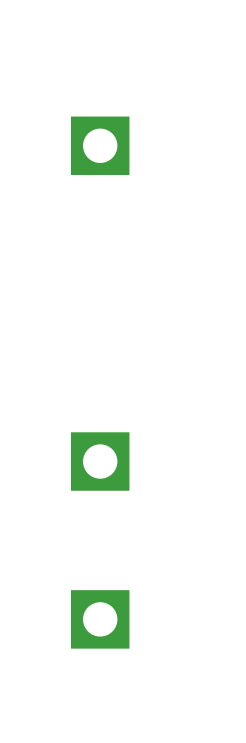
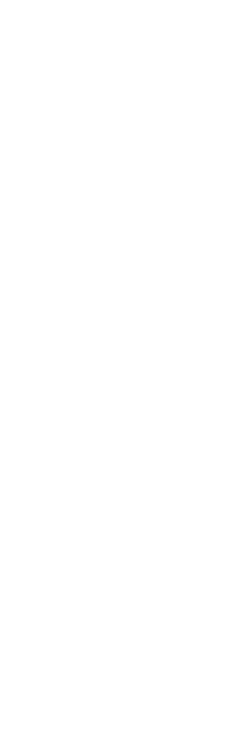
part: (100, 145) -> none
part: (100, 461) -> none
part: (100, 619) -> none

